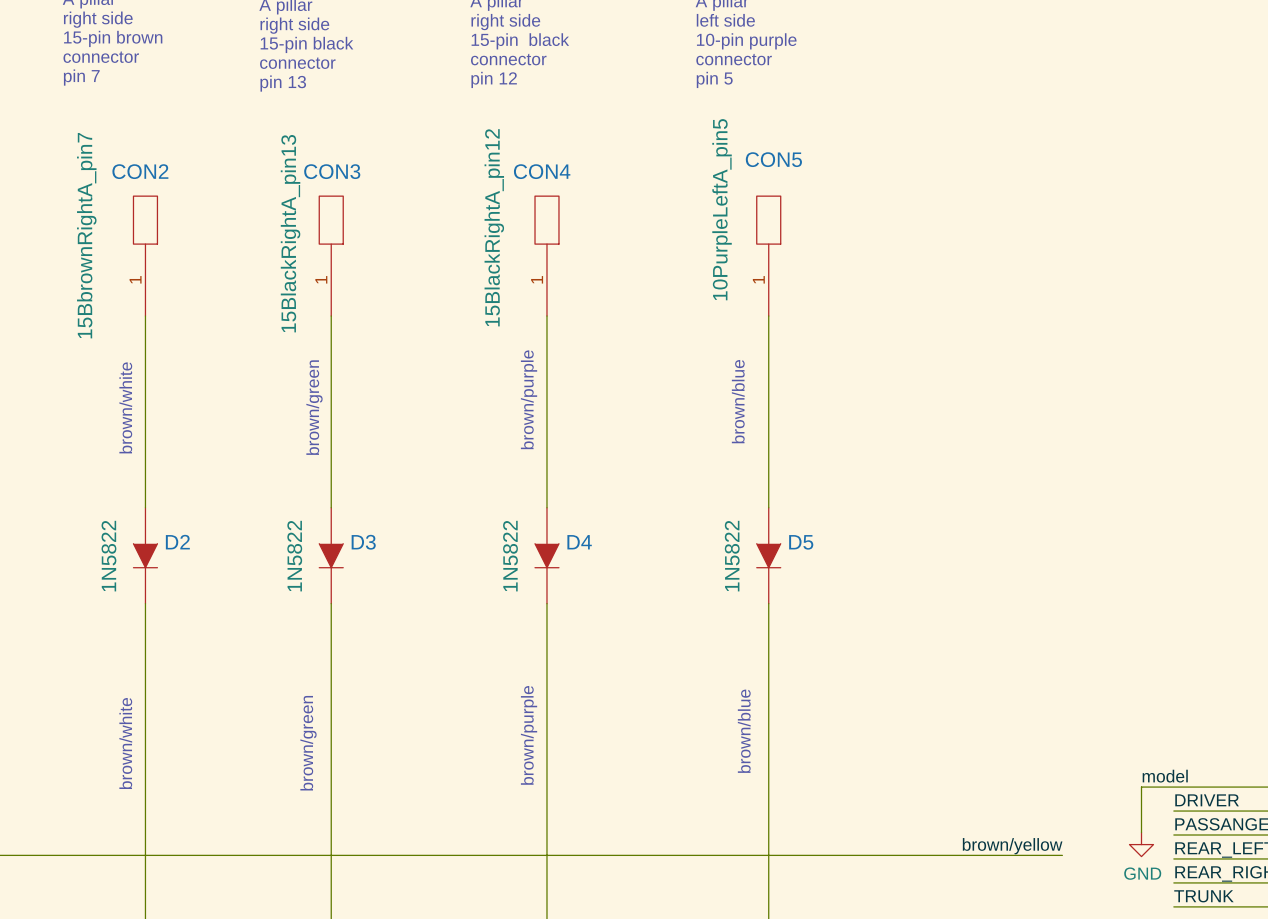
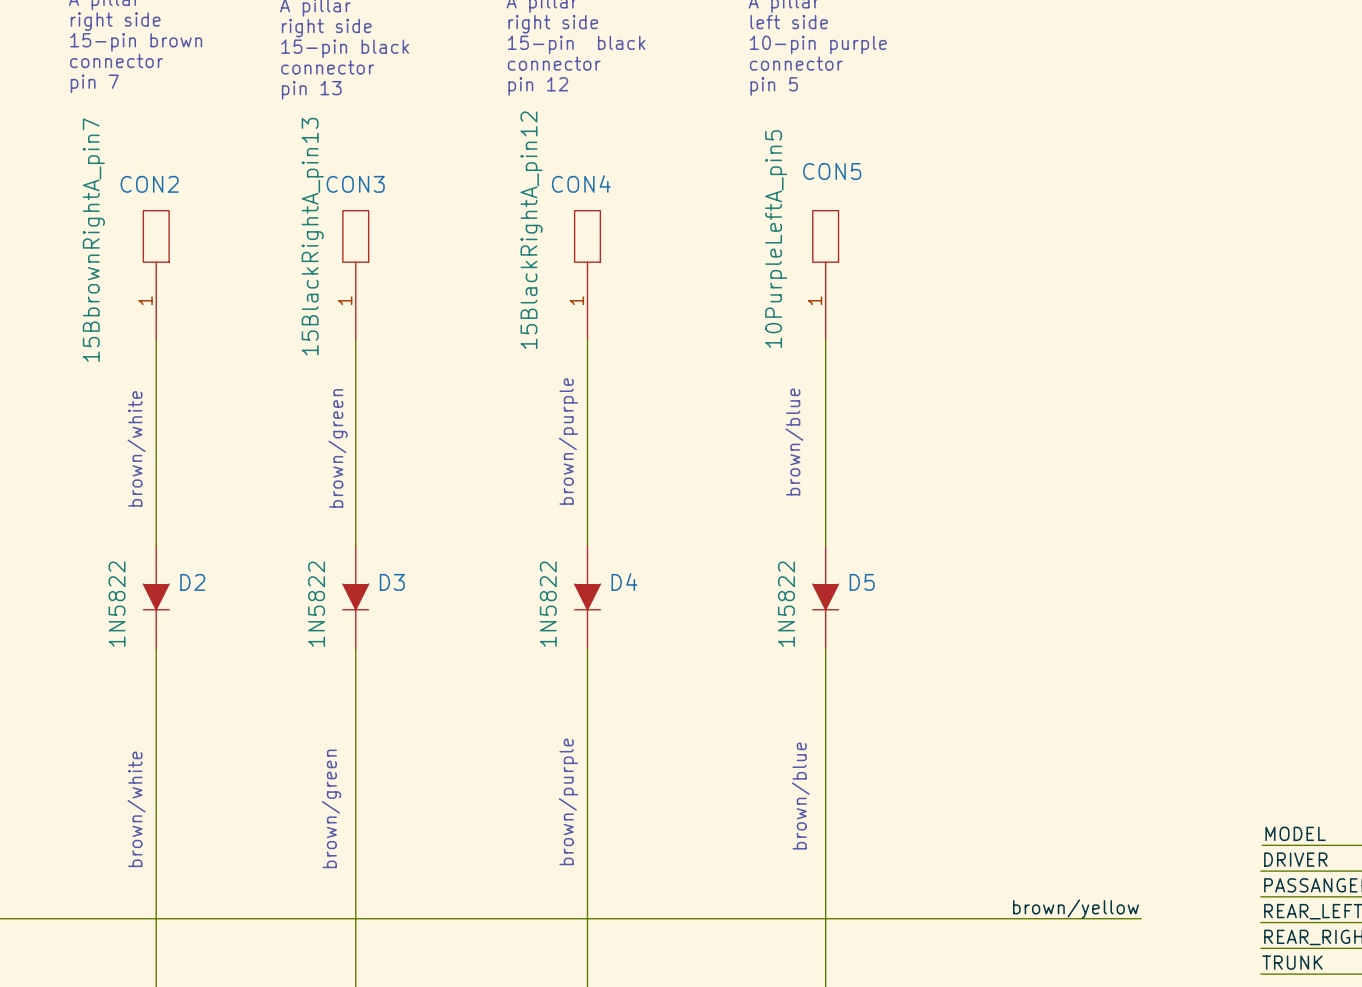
label: model (1165, 776) -> none
label: none -> MODEL (1295, 833)
wire: (1175, 787) (1141, 787) (1141, 832) -> none
power symbol: GND (1141, 844) -> none

